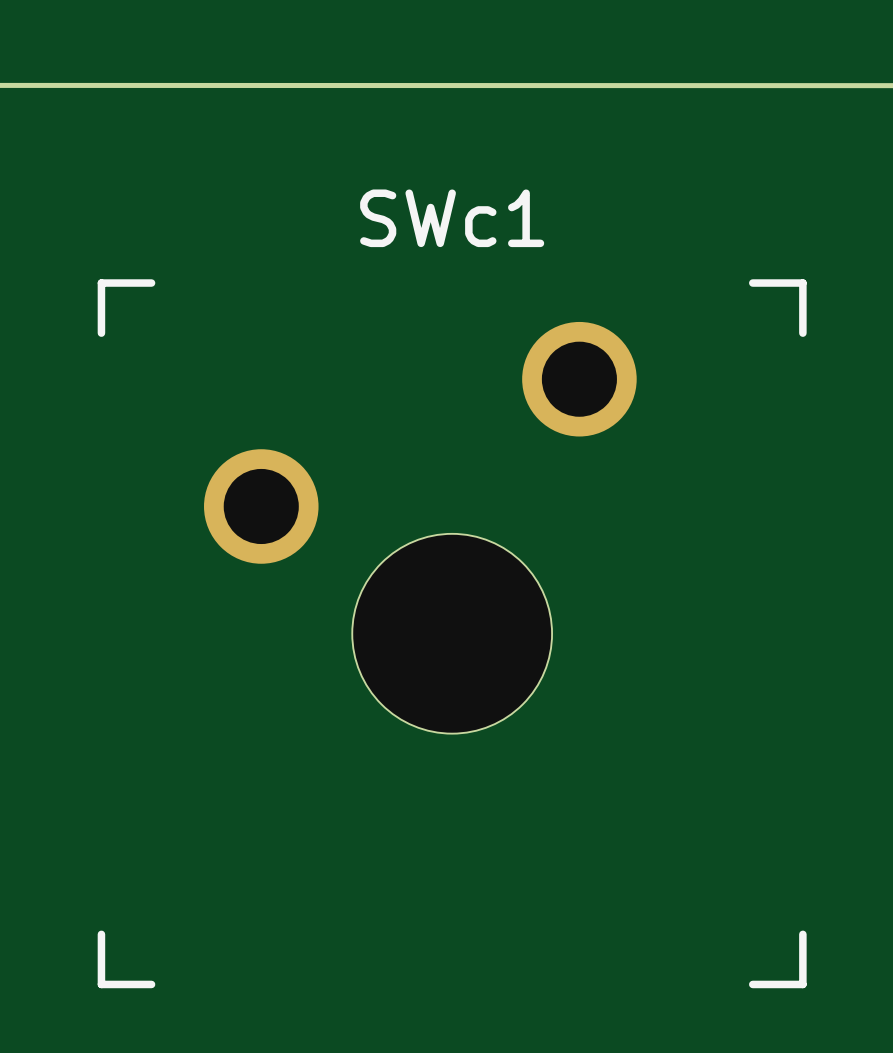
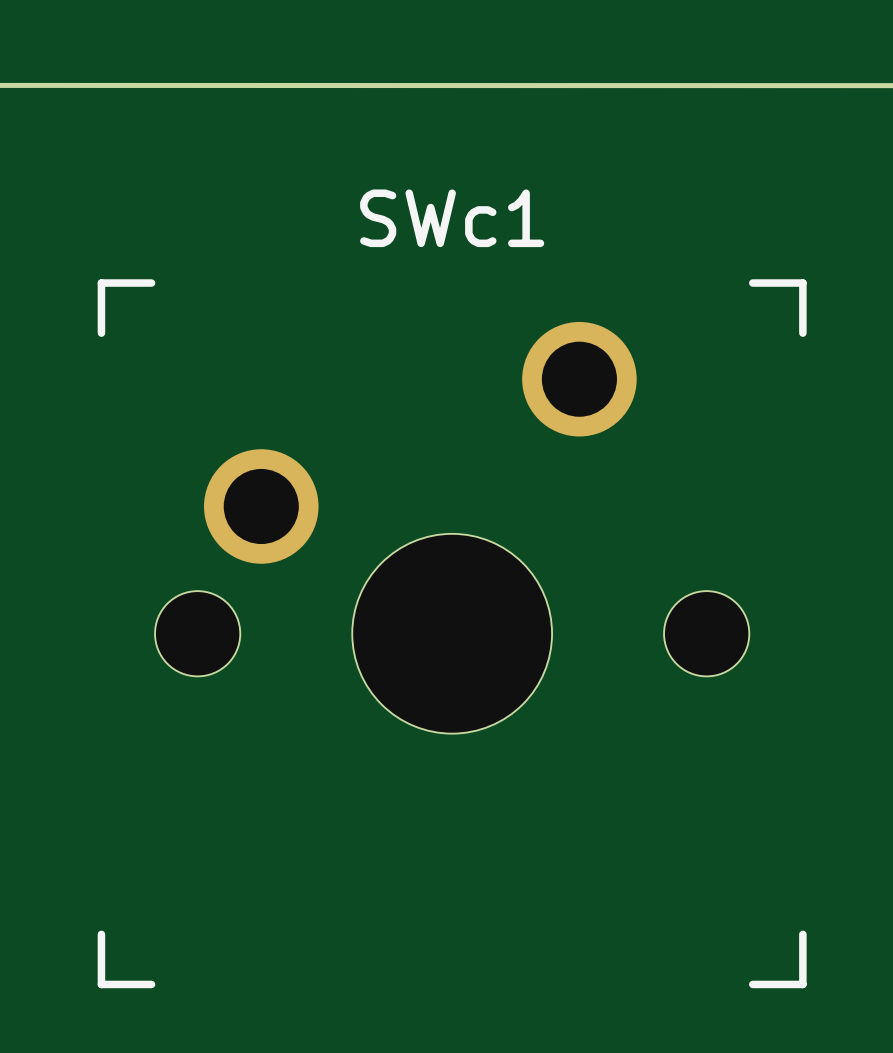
SWc1 footprint: [97, 279, 807, 989] -> [97, 279, 807, 989]

